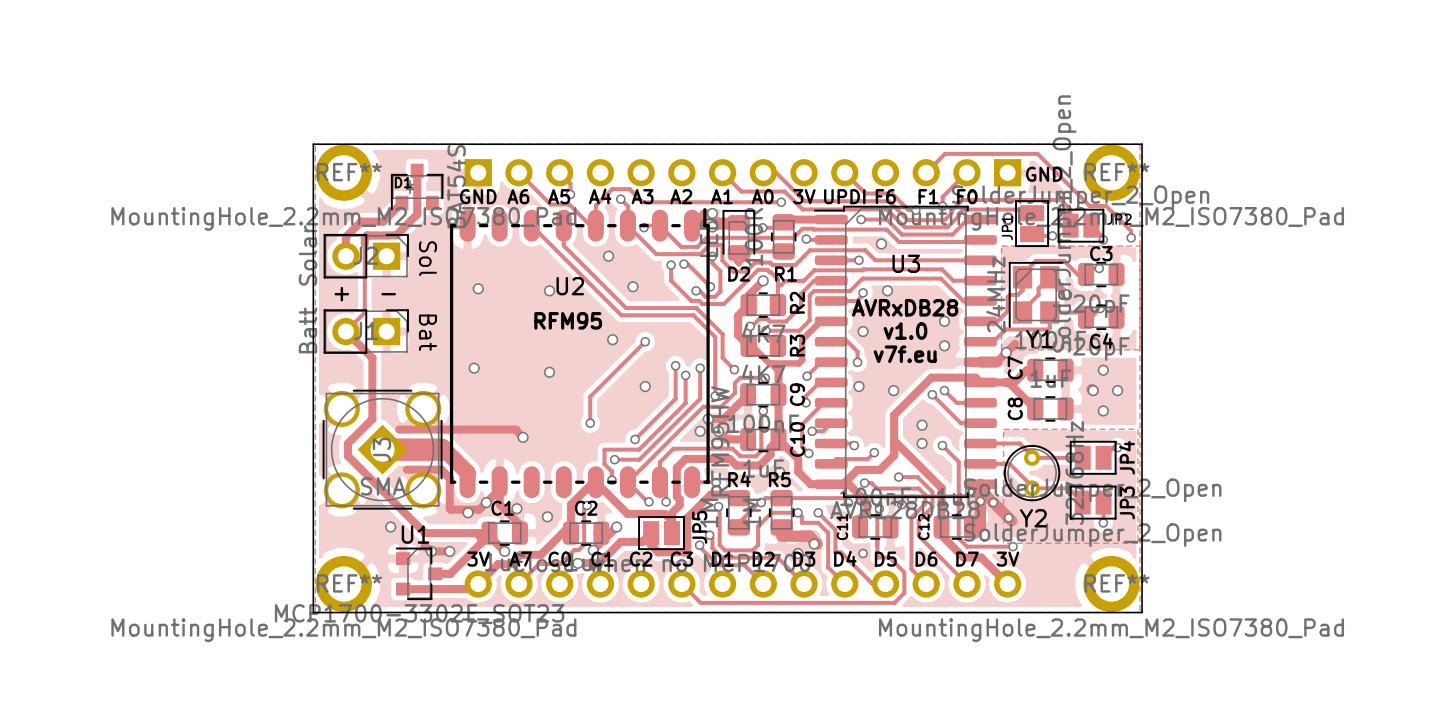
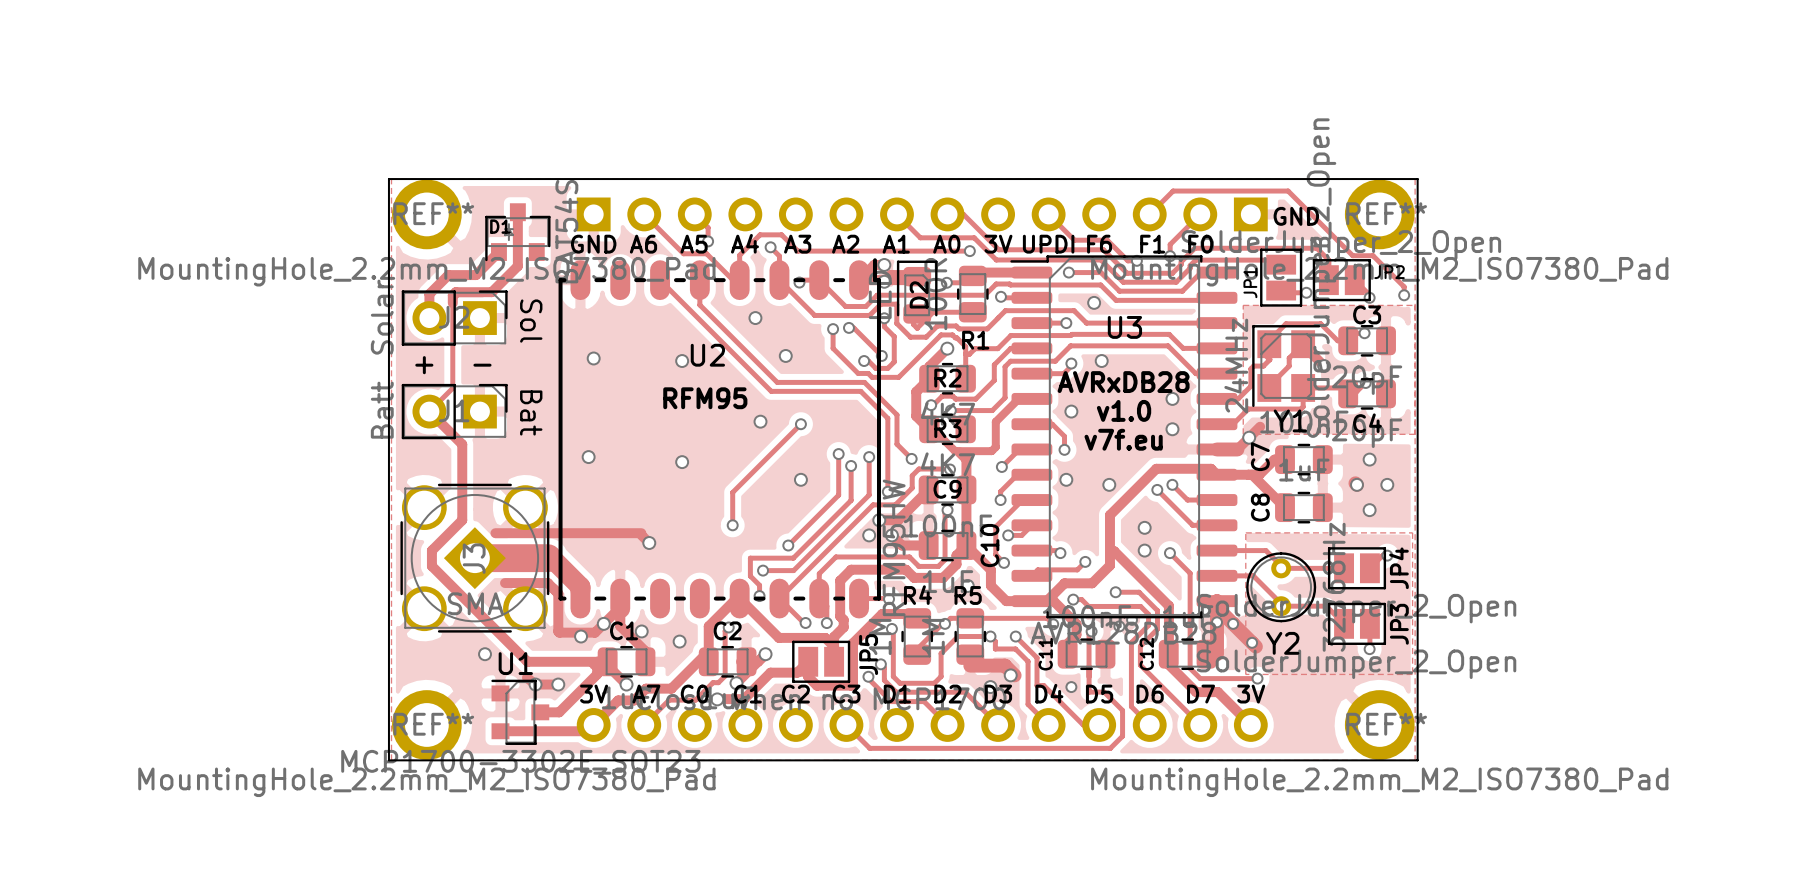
D2 name rotation: 0° (739, 274) -> 90° counterclockwise (919, 294)
D2 name position: D2 (739, 274) -> D2 (919, 294)
R2 name rotation: 0° (797, 302) -> 90° clockwise (947, 378)
R2 name position: R2 (797, 302) -> R2 (947, 378)
R3 name rotation: 0° (797, 345) -> 90° clockwise (947, 428)
R3 name position: R3 (797, 345) -> R3 (947, 428)
C9 name rotation: 0° (797, 394) -> 90° clockwise (947, 489)
C9 name position: C9 (797, 394) -> C9 (947, 489)

